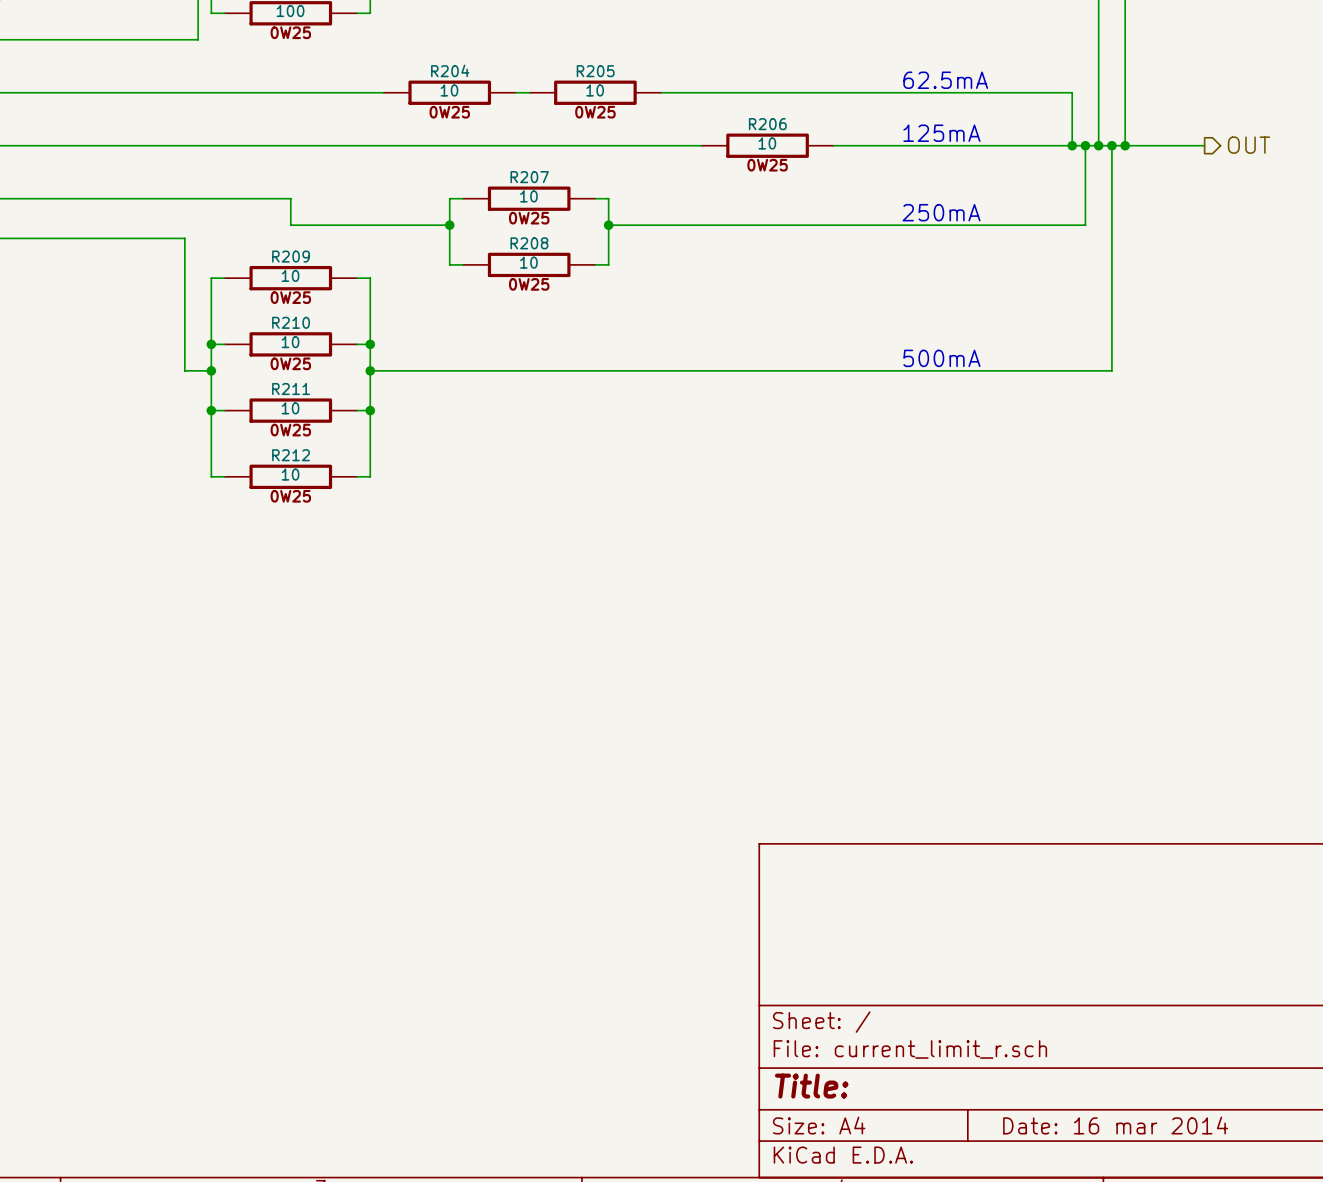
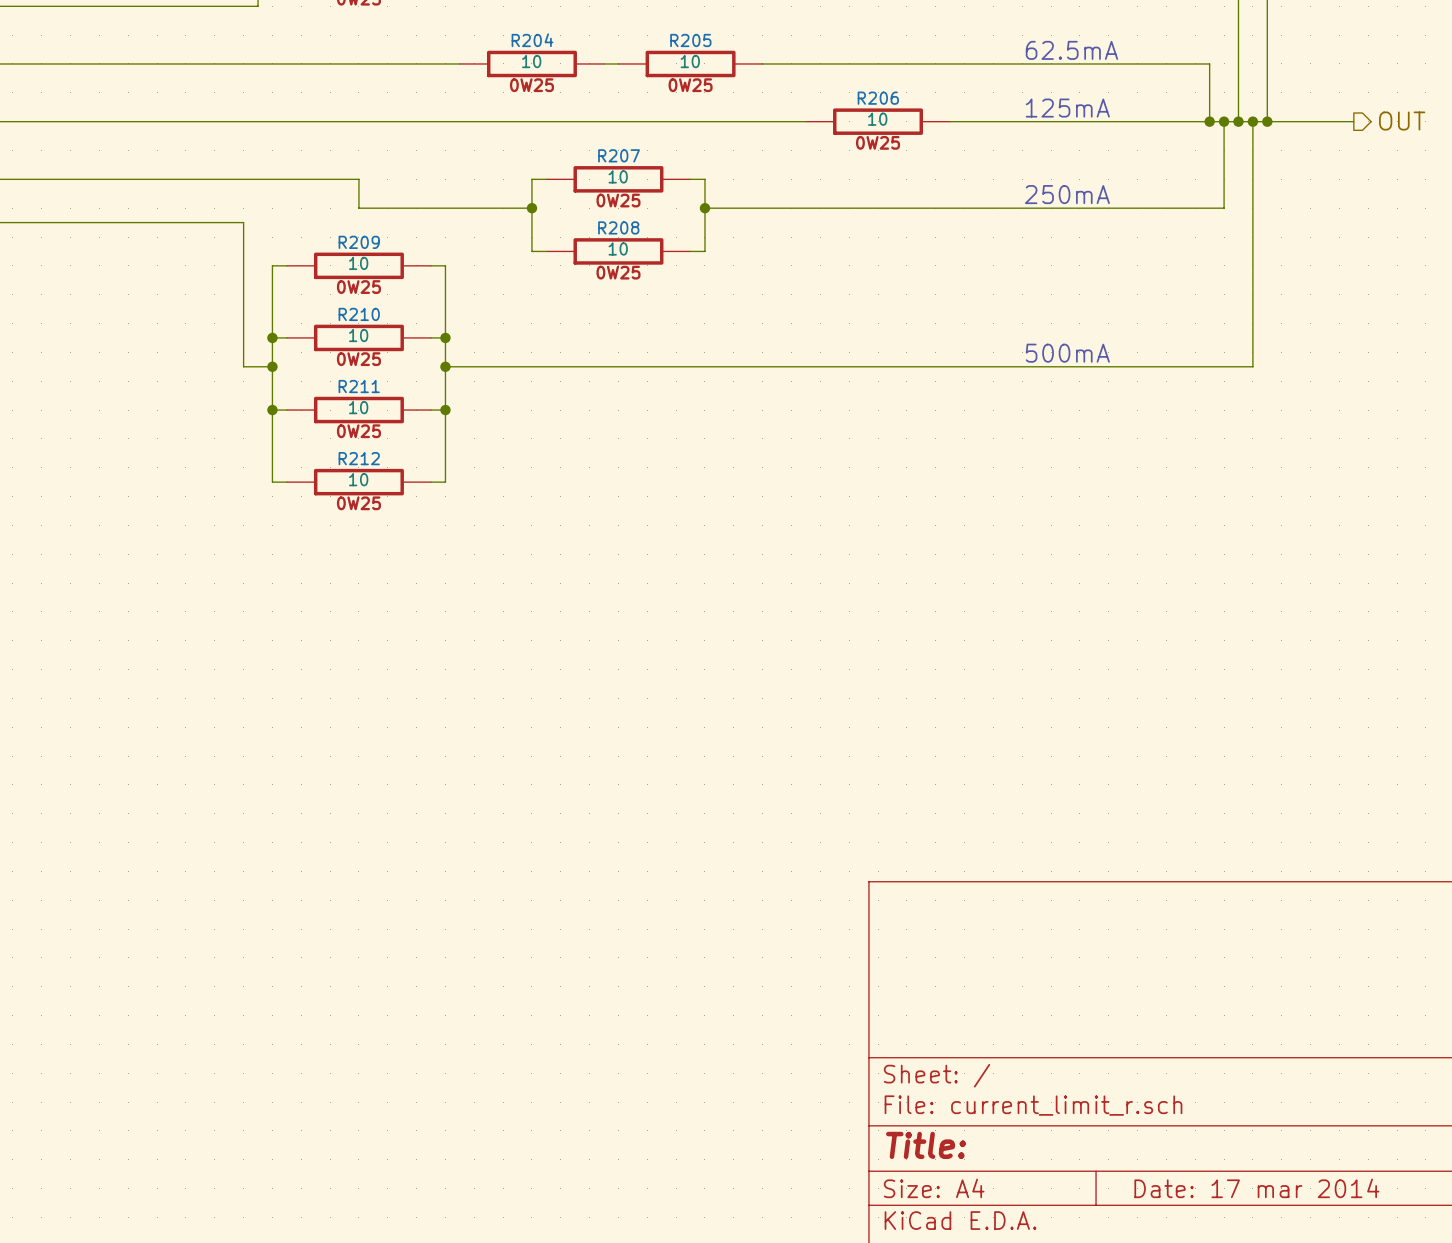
title block: Date: 16 mar 2014 (1115, 1125) -> Date: 17 mar 2014 (1256, 1188)

